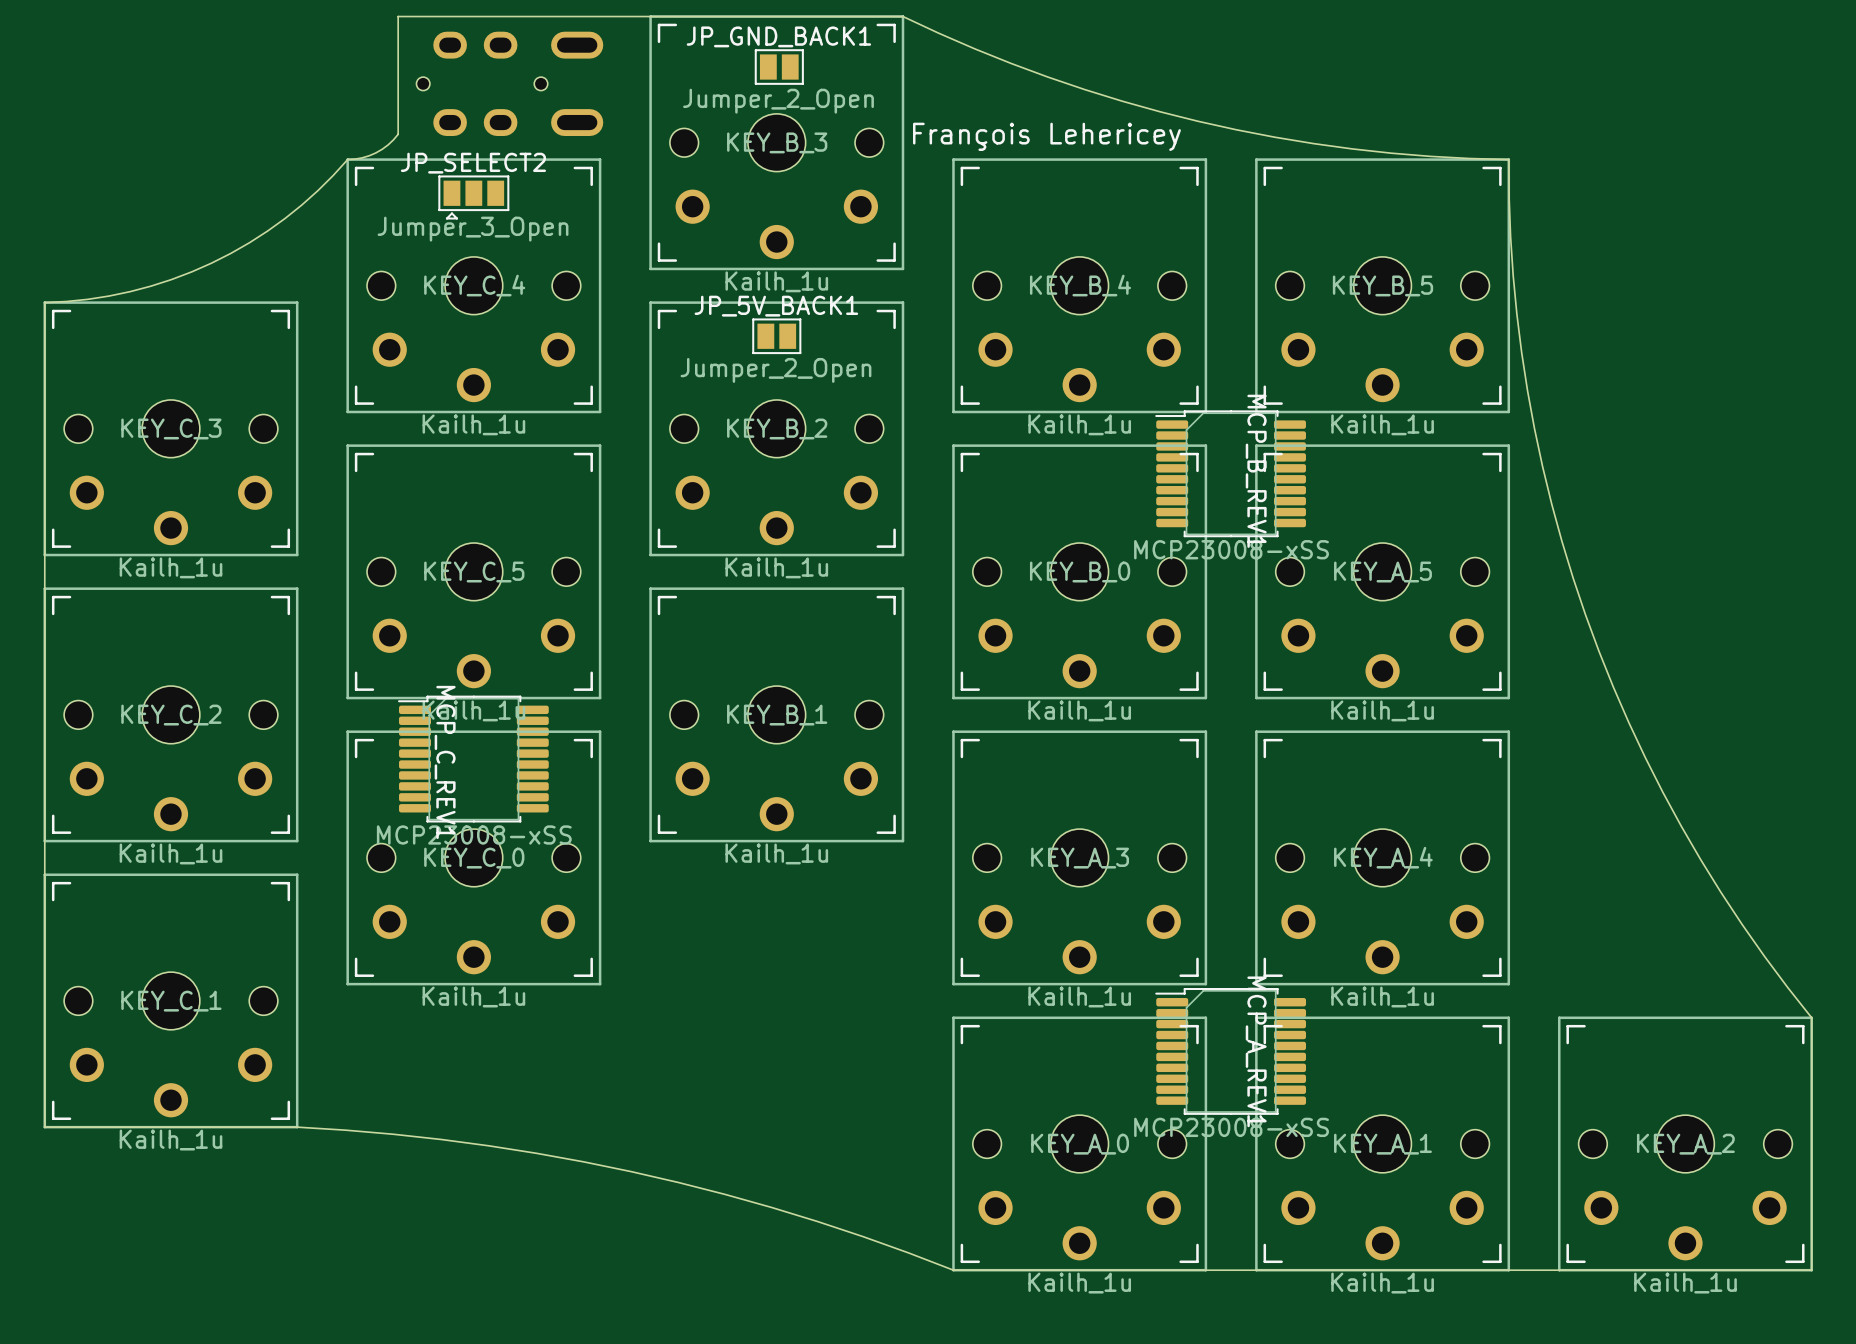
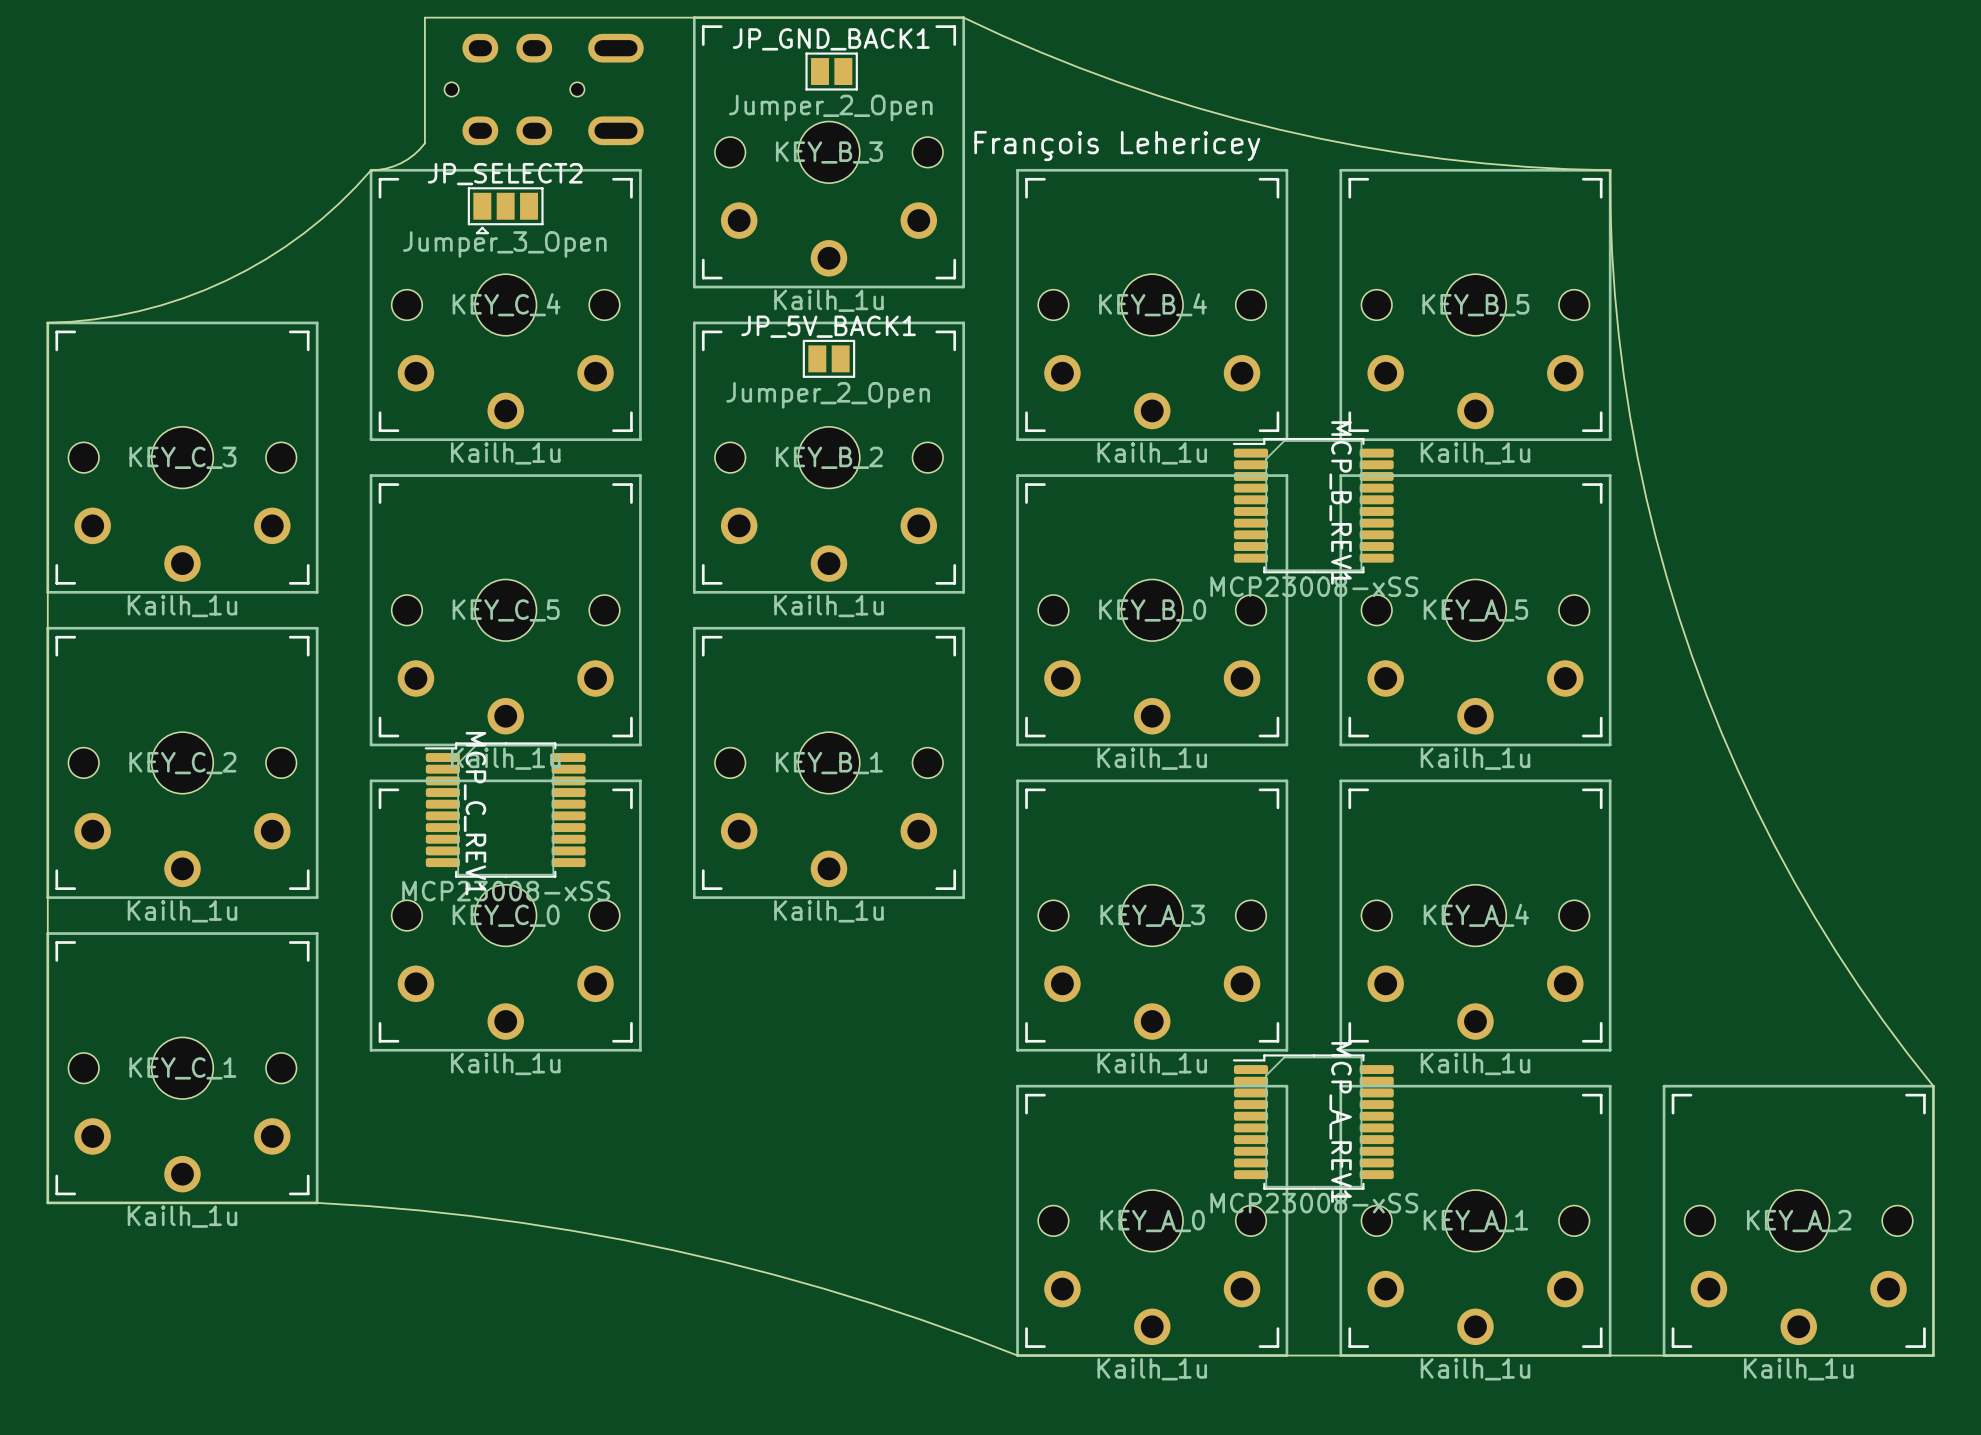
KEY_B_0 footprint: [952, 444, 1208, 700] -> [1016, 474, 1289, 747]
KEY_A_5 footprint: [1255, 444, 1511, 700] -> [1339, 474, 1612, 747]
KEY_A_0 footprint: [952, 1016, 1208, 1272] -> [1016, 1084, 1289, 1357]
KEY_A_1 footprint: [1255, 1016, 1511, 1272] -> [1339, 1084, 1612, 1357]

